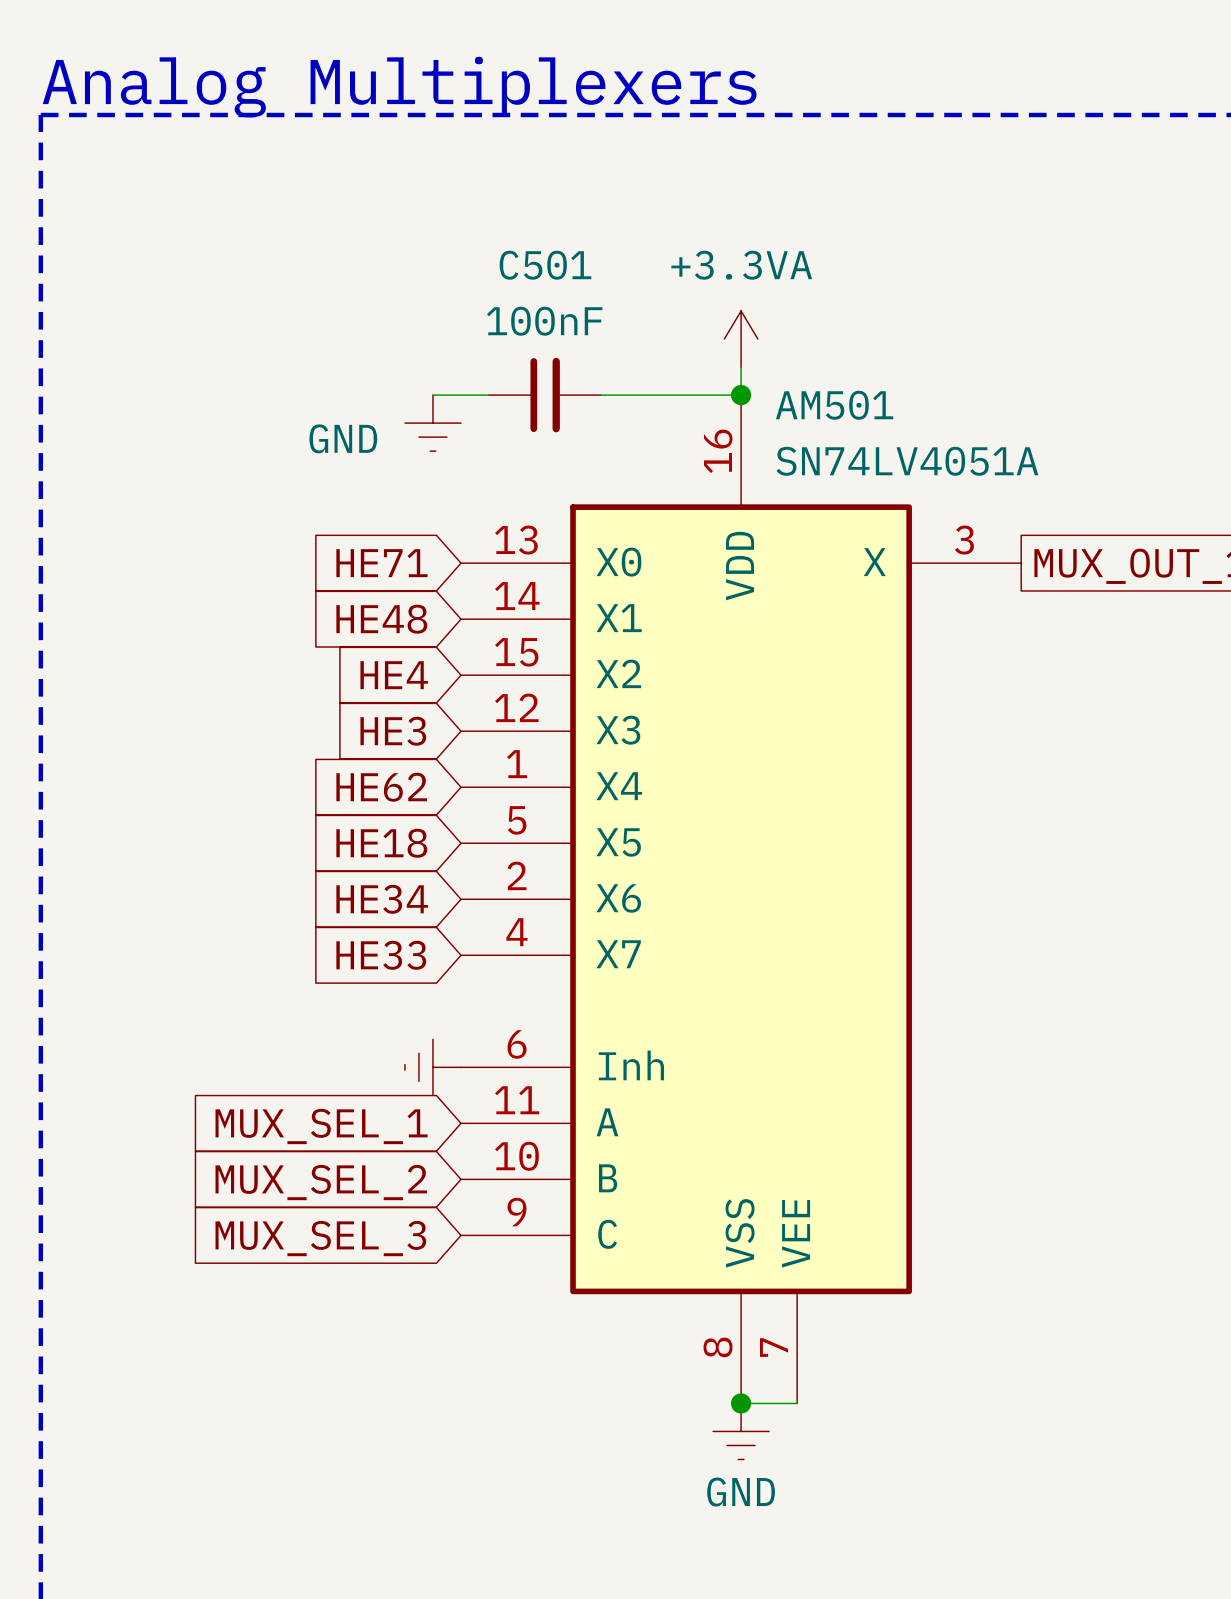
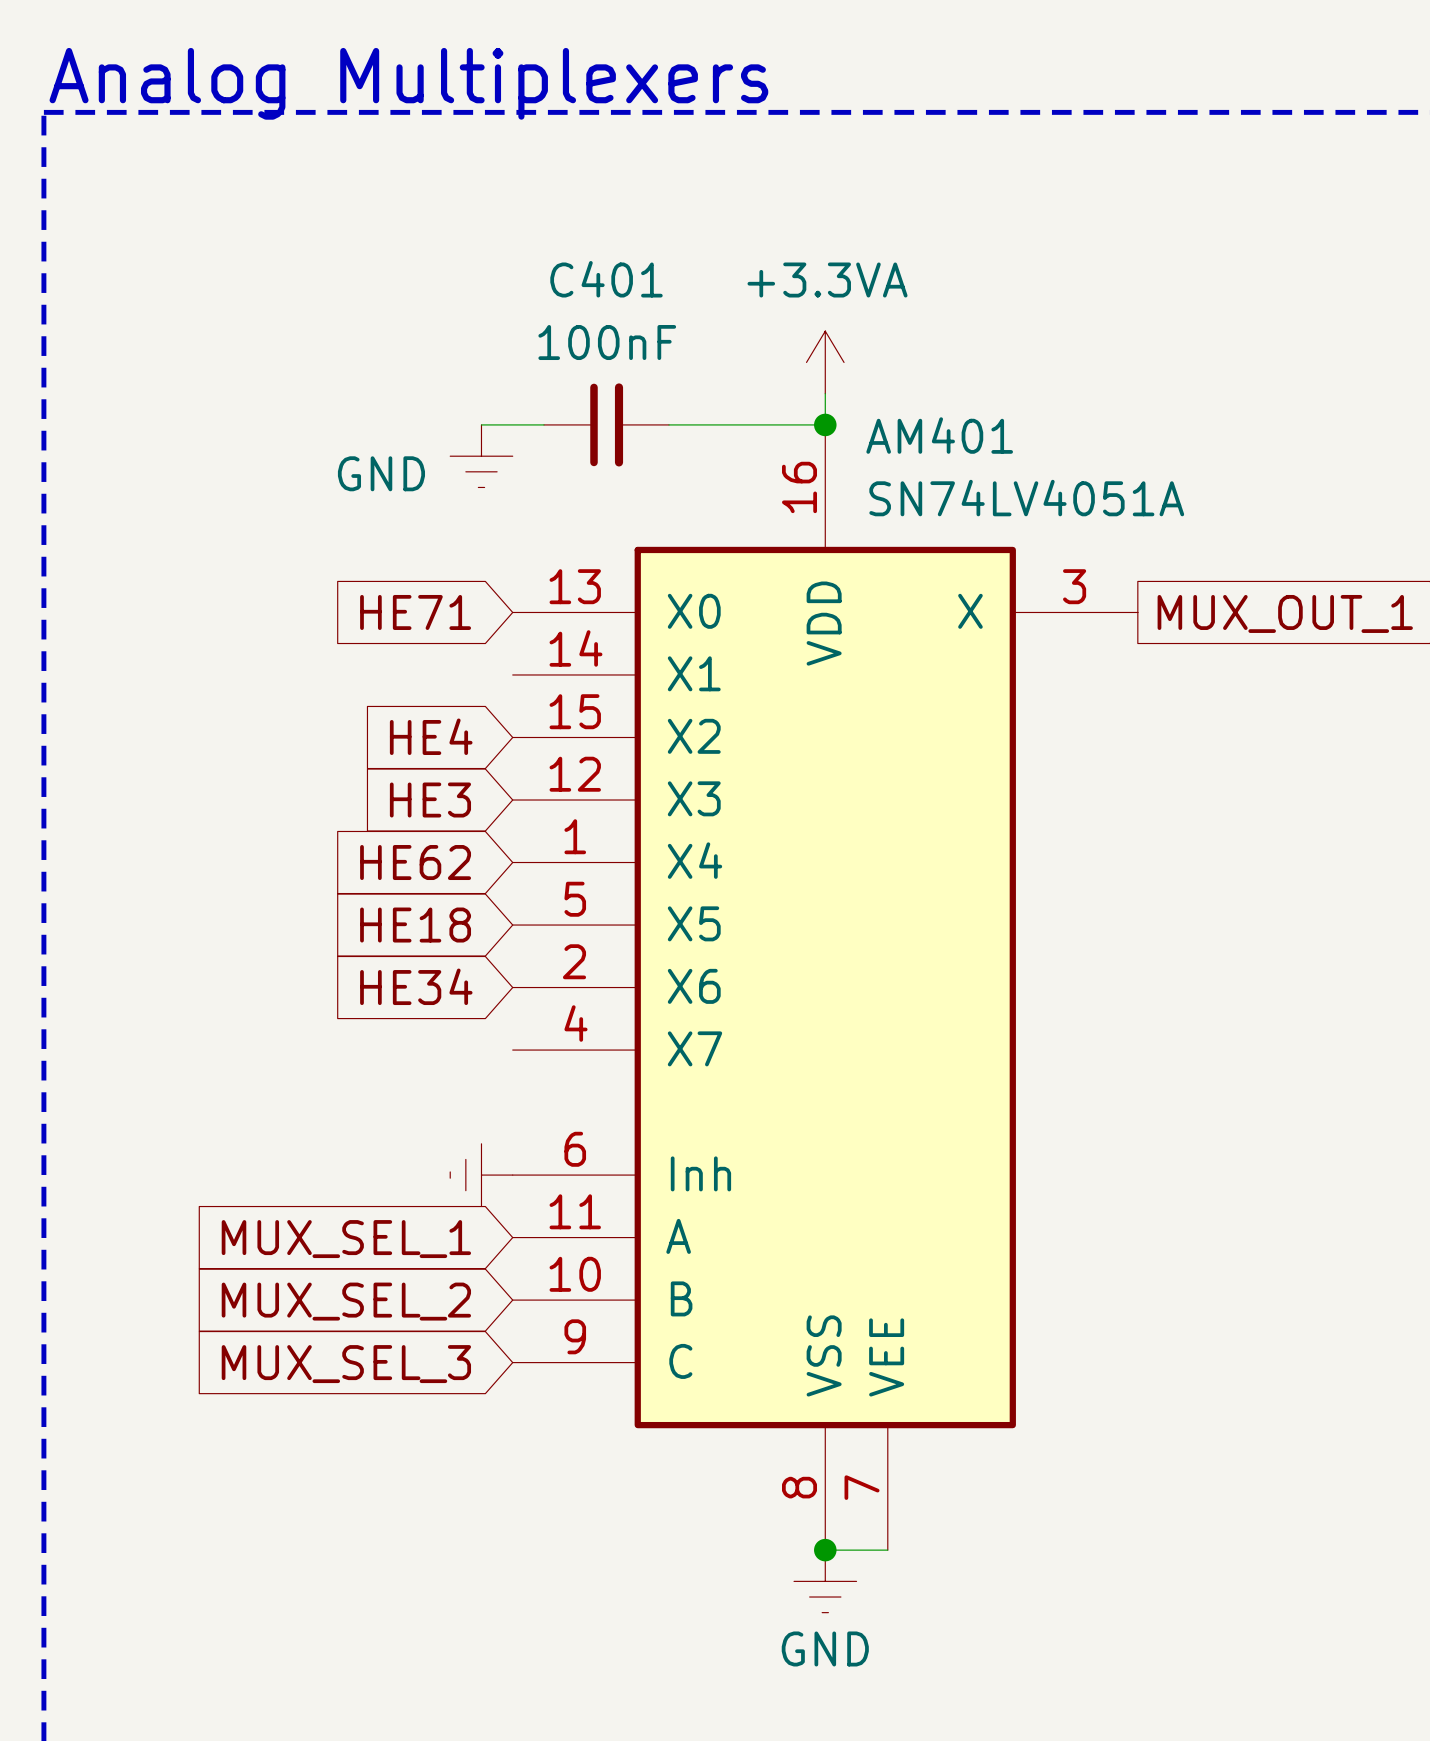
C501 name: C501 (545, 265) -> C401 (606, 279)
AM501 name: AM501 (834, 405) -> AM401 (939, 435)
global label: HE48 (381, 619) -> none
global label: HE33 (381, 955) -> none

